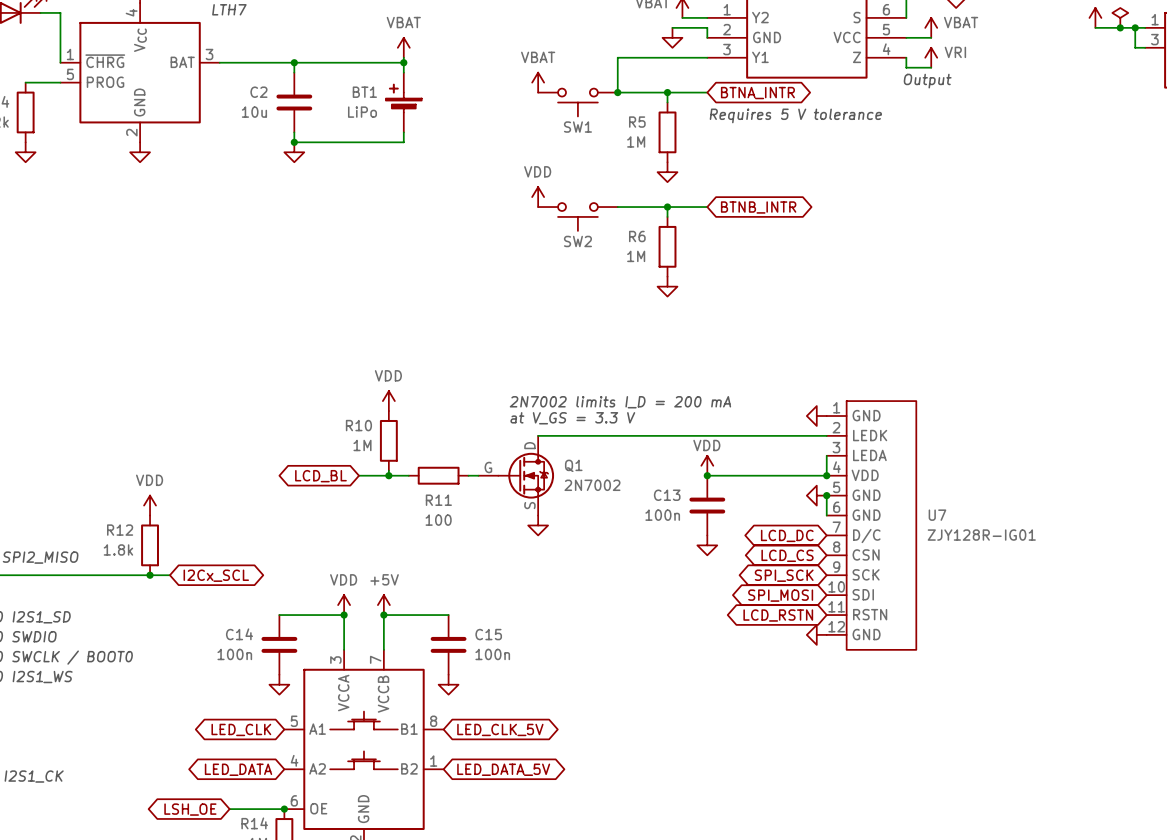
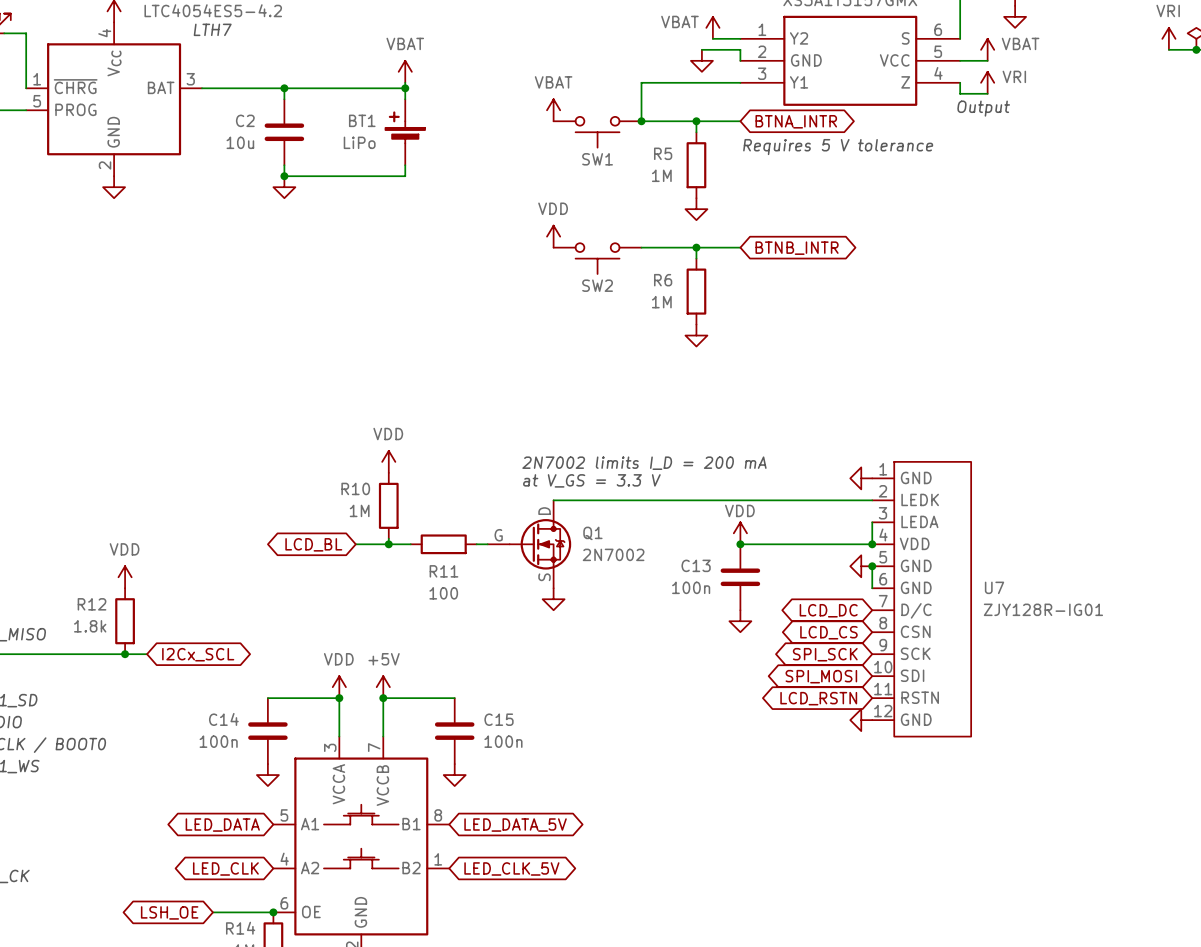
global label: LED_CLK (241, 729) -> LED_DATA (222, 825)
global label: LED_CLK_5V (500, 729) -> LED_DATA_5V (515, 825)
global label: LED_DATA (238, 769) -> LED_CLK (225, 868)
global label: LED_DATA_5V (503, 769) -> LED_CLK_5V (511, 868)

